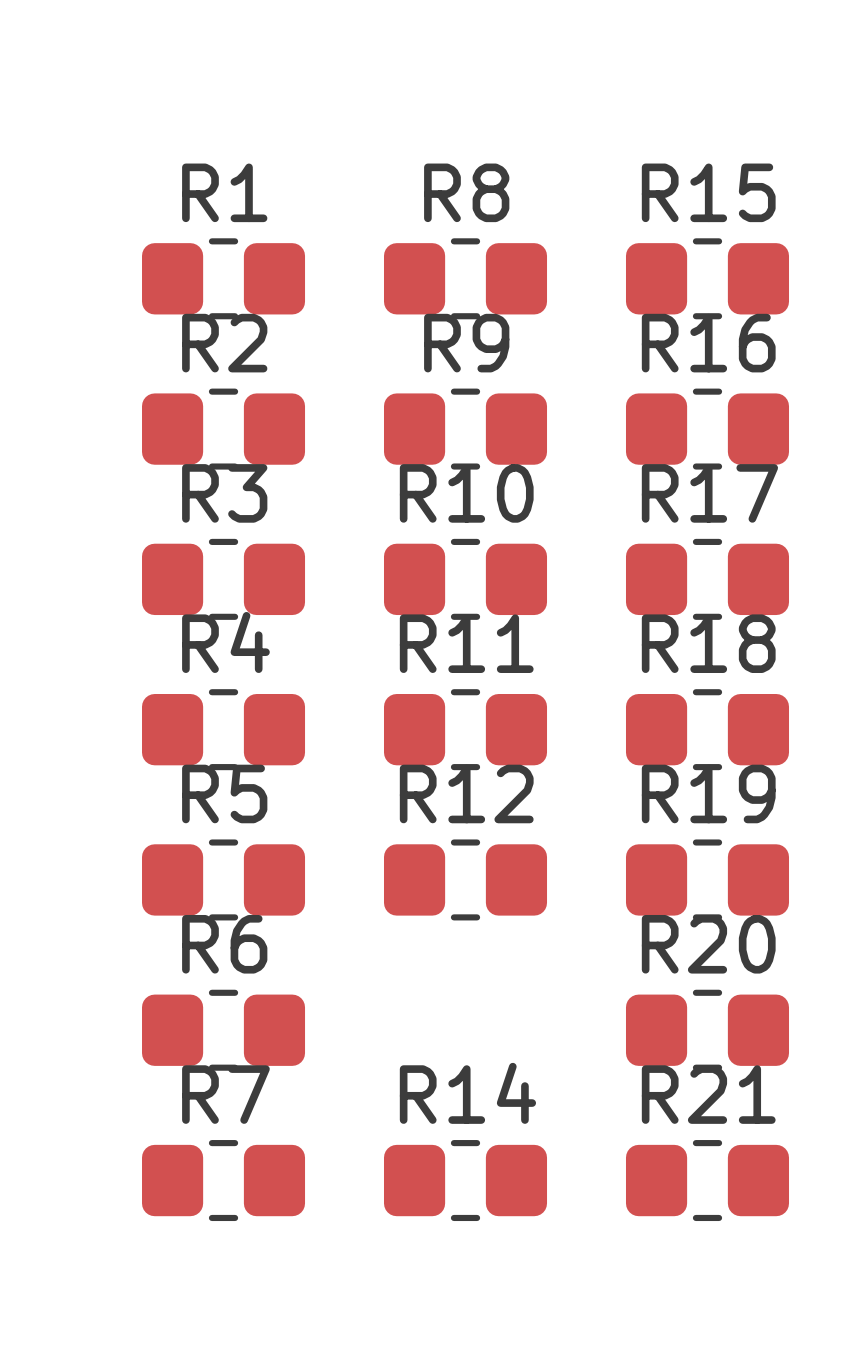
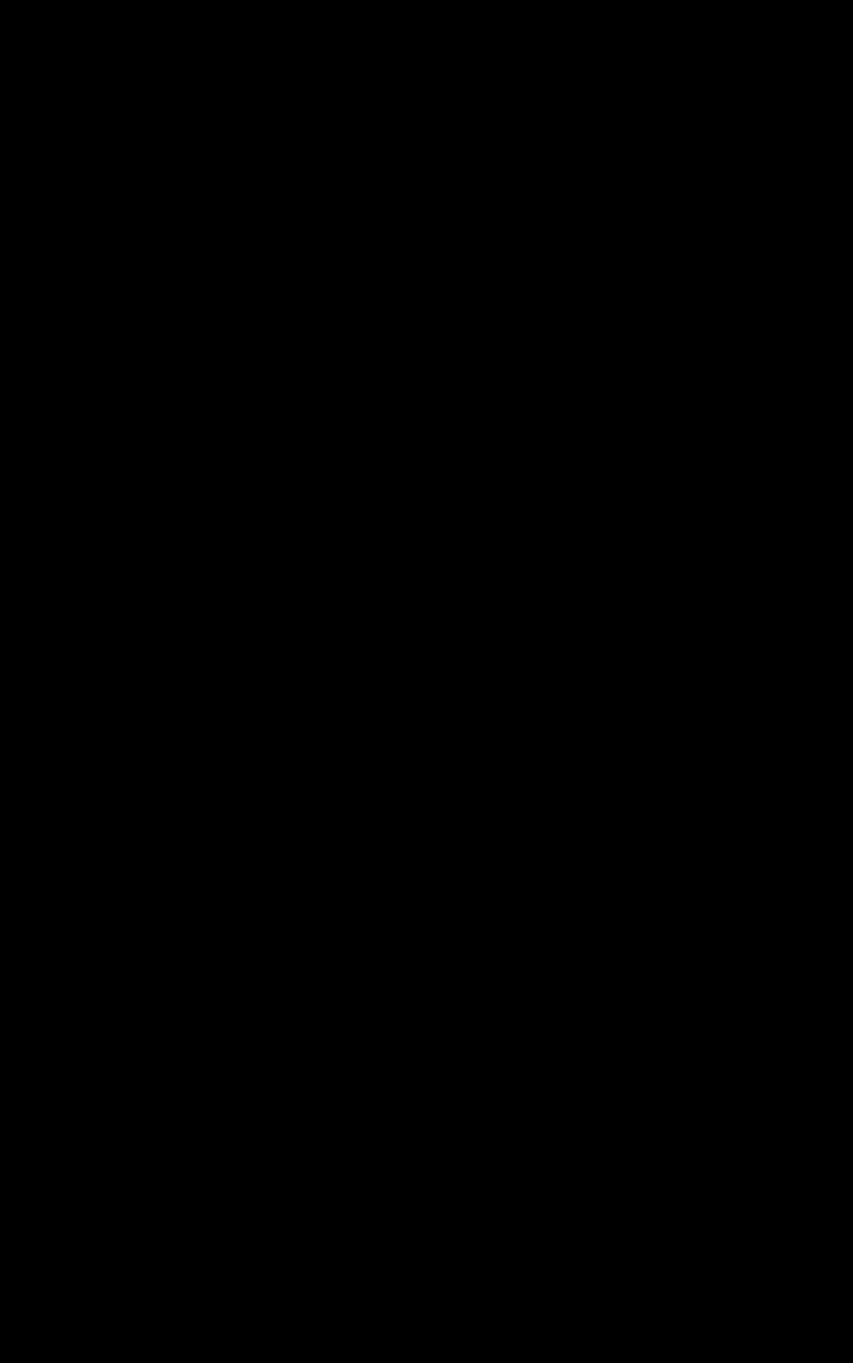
R1: (223, 278) -> none
R8: (465, 278) -> none
R15: (707, 278) -> none
R2: (223, 429) -> none
R9: (465, 429) -> none
R16: (707, 429) -> none
R3: (223, 579) -> none
R10: (465, 579) -> none
R17: (707, 579) -> none
R4: (223, 729) -> none
R11: (465, 729) -> none
R18: (707, 729) -> none
R5: (223, 879) -> none
R12: (465, 879) -> none
R19: (707, 879) -> none
R6: (223, 1030) -> none
R20: (707, 1030) -> none
R7: (223, 1180) -> none
R14: (465, 1180) -> none
R21: (707, 1180) -> none

